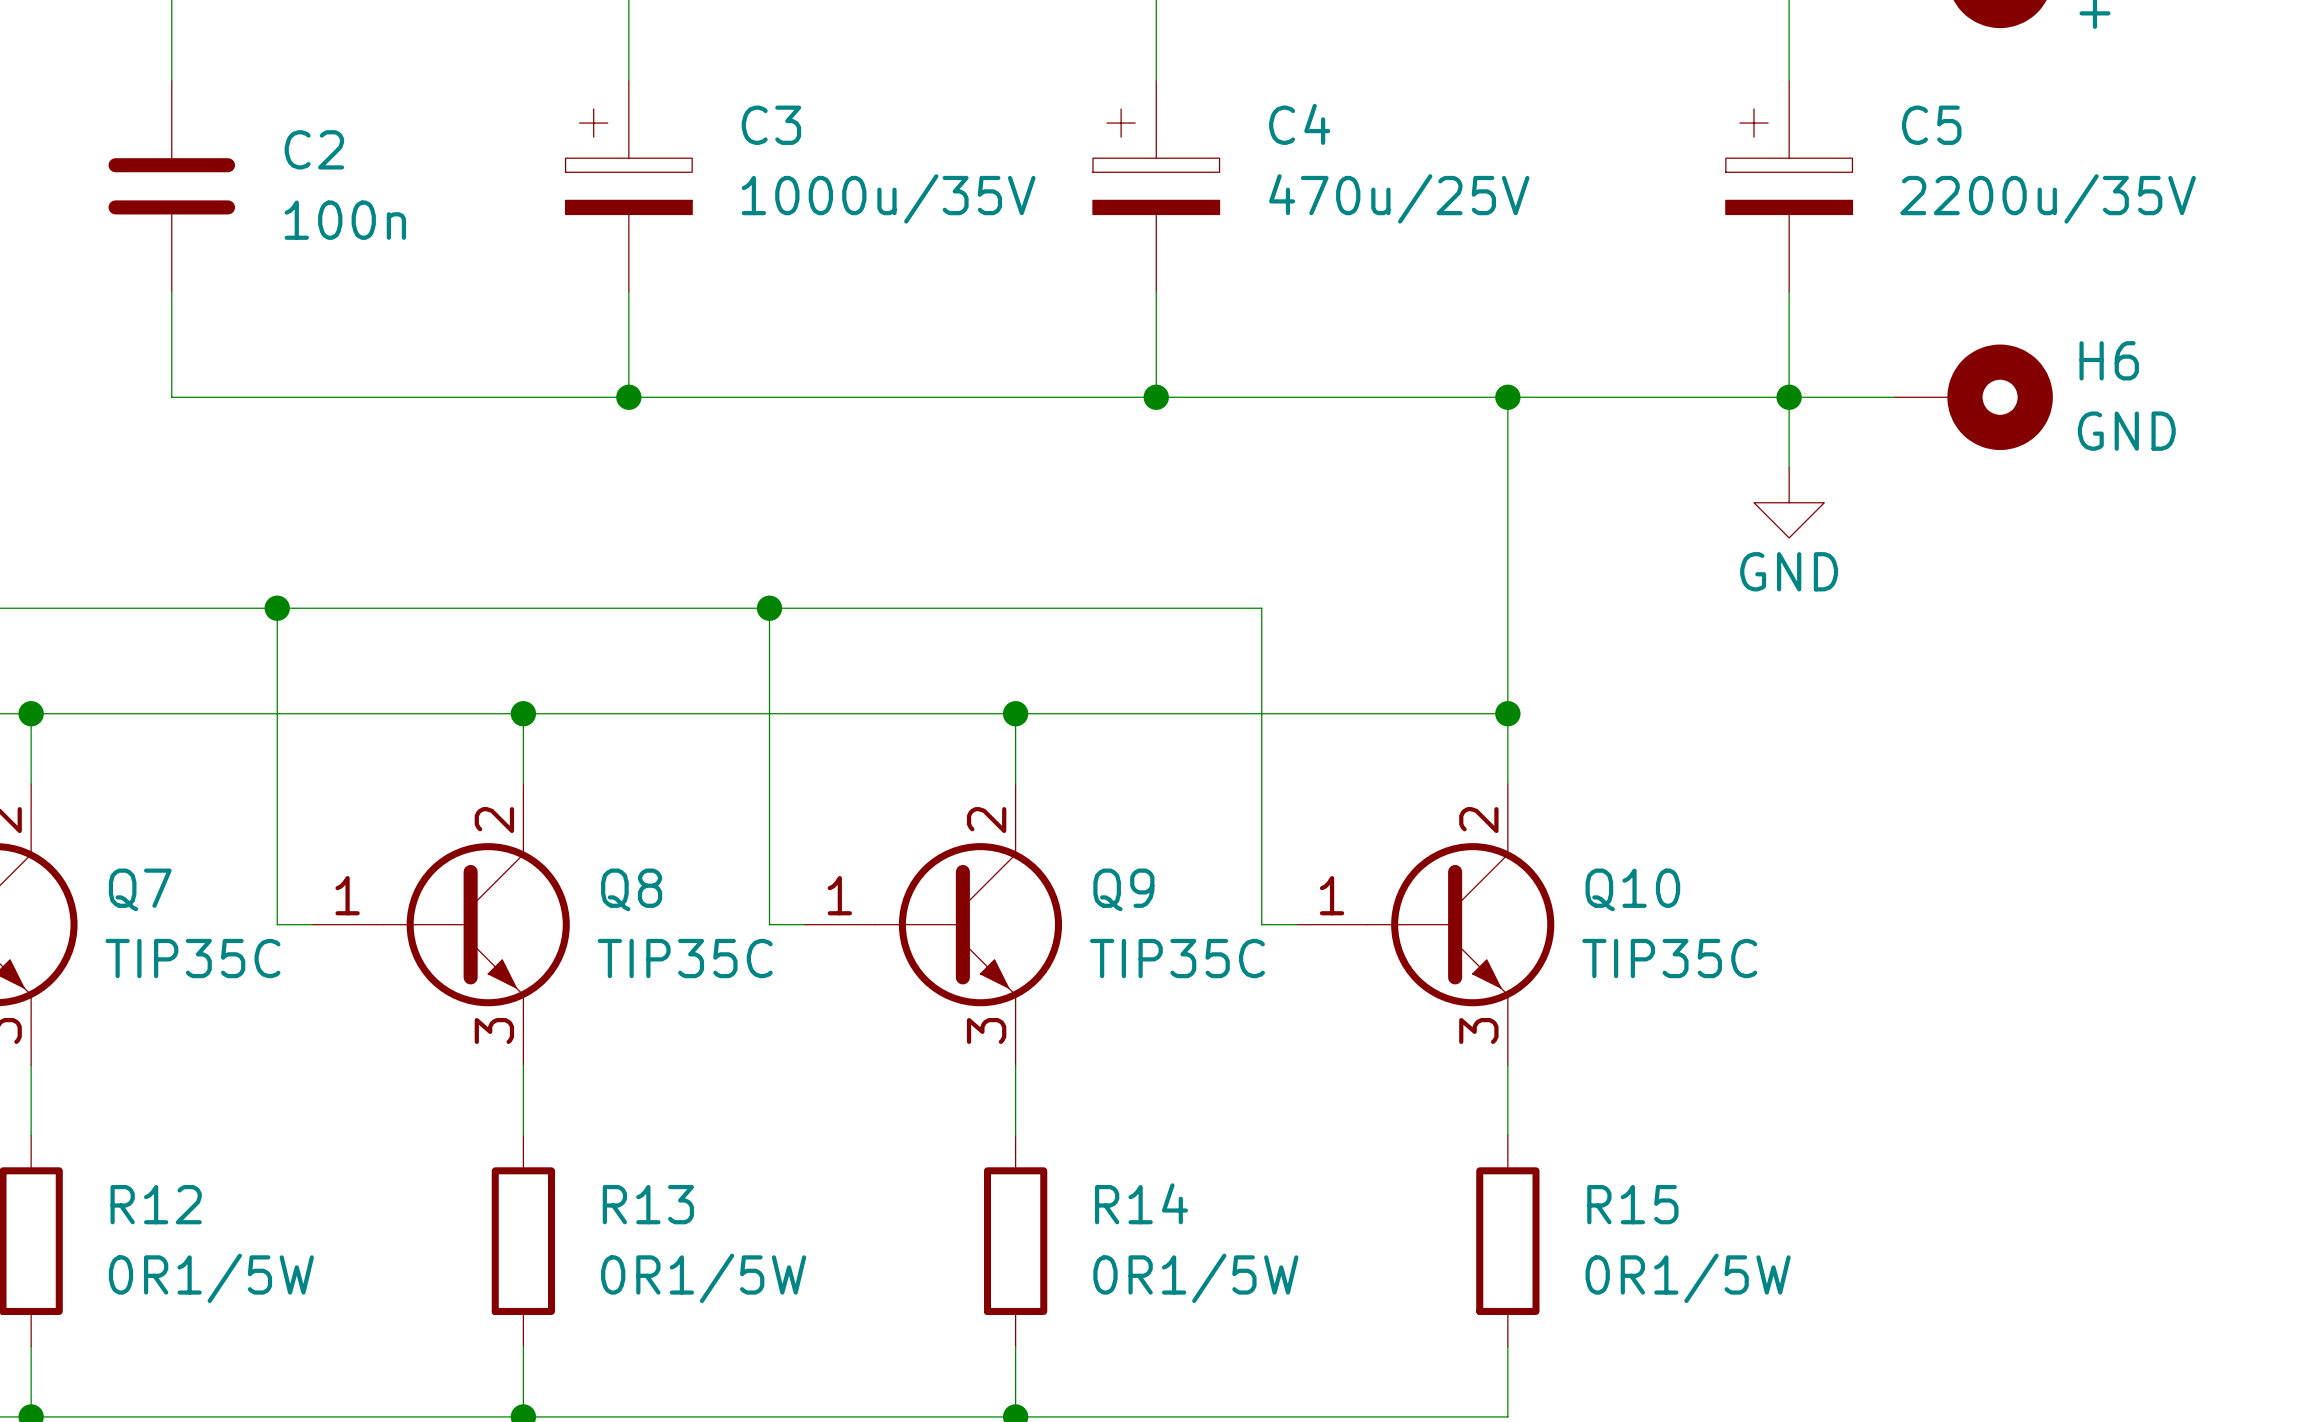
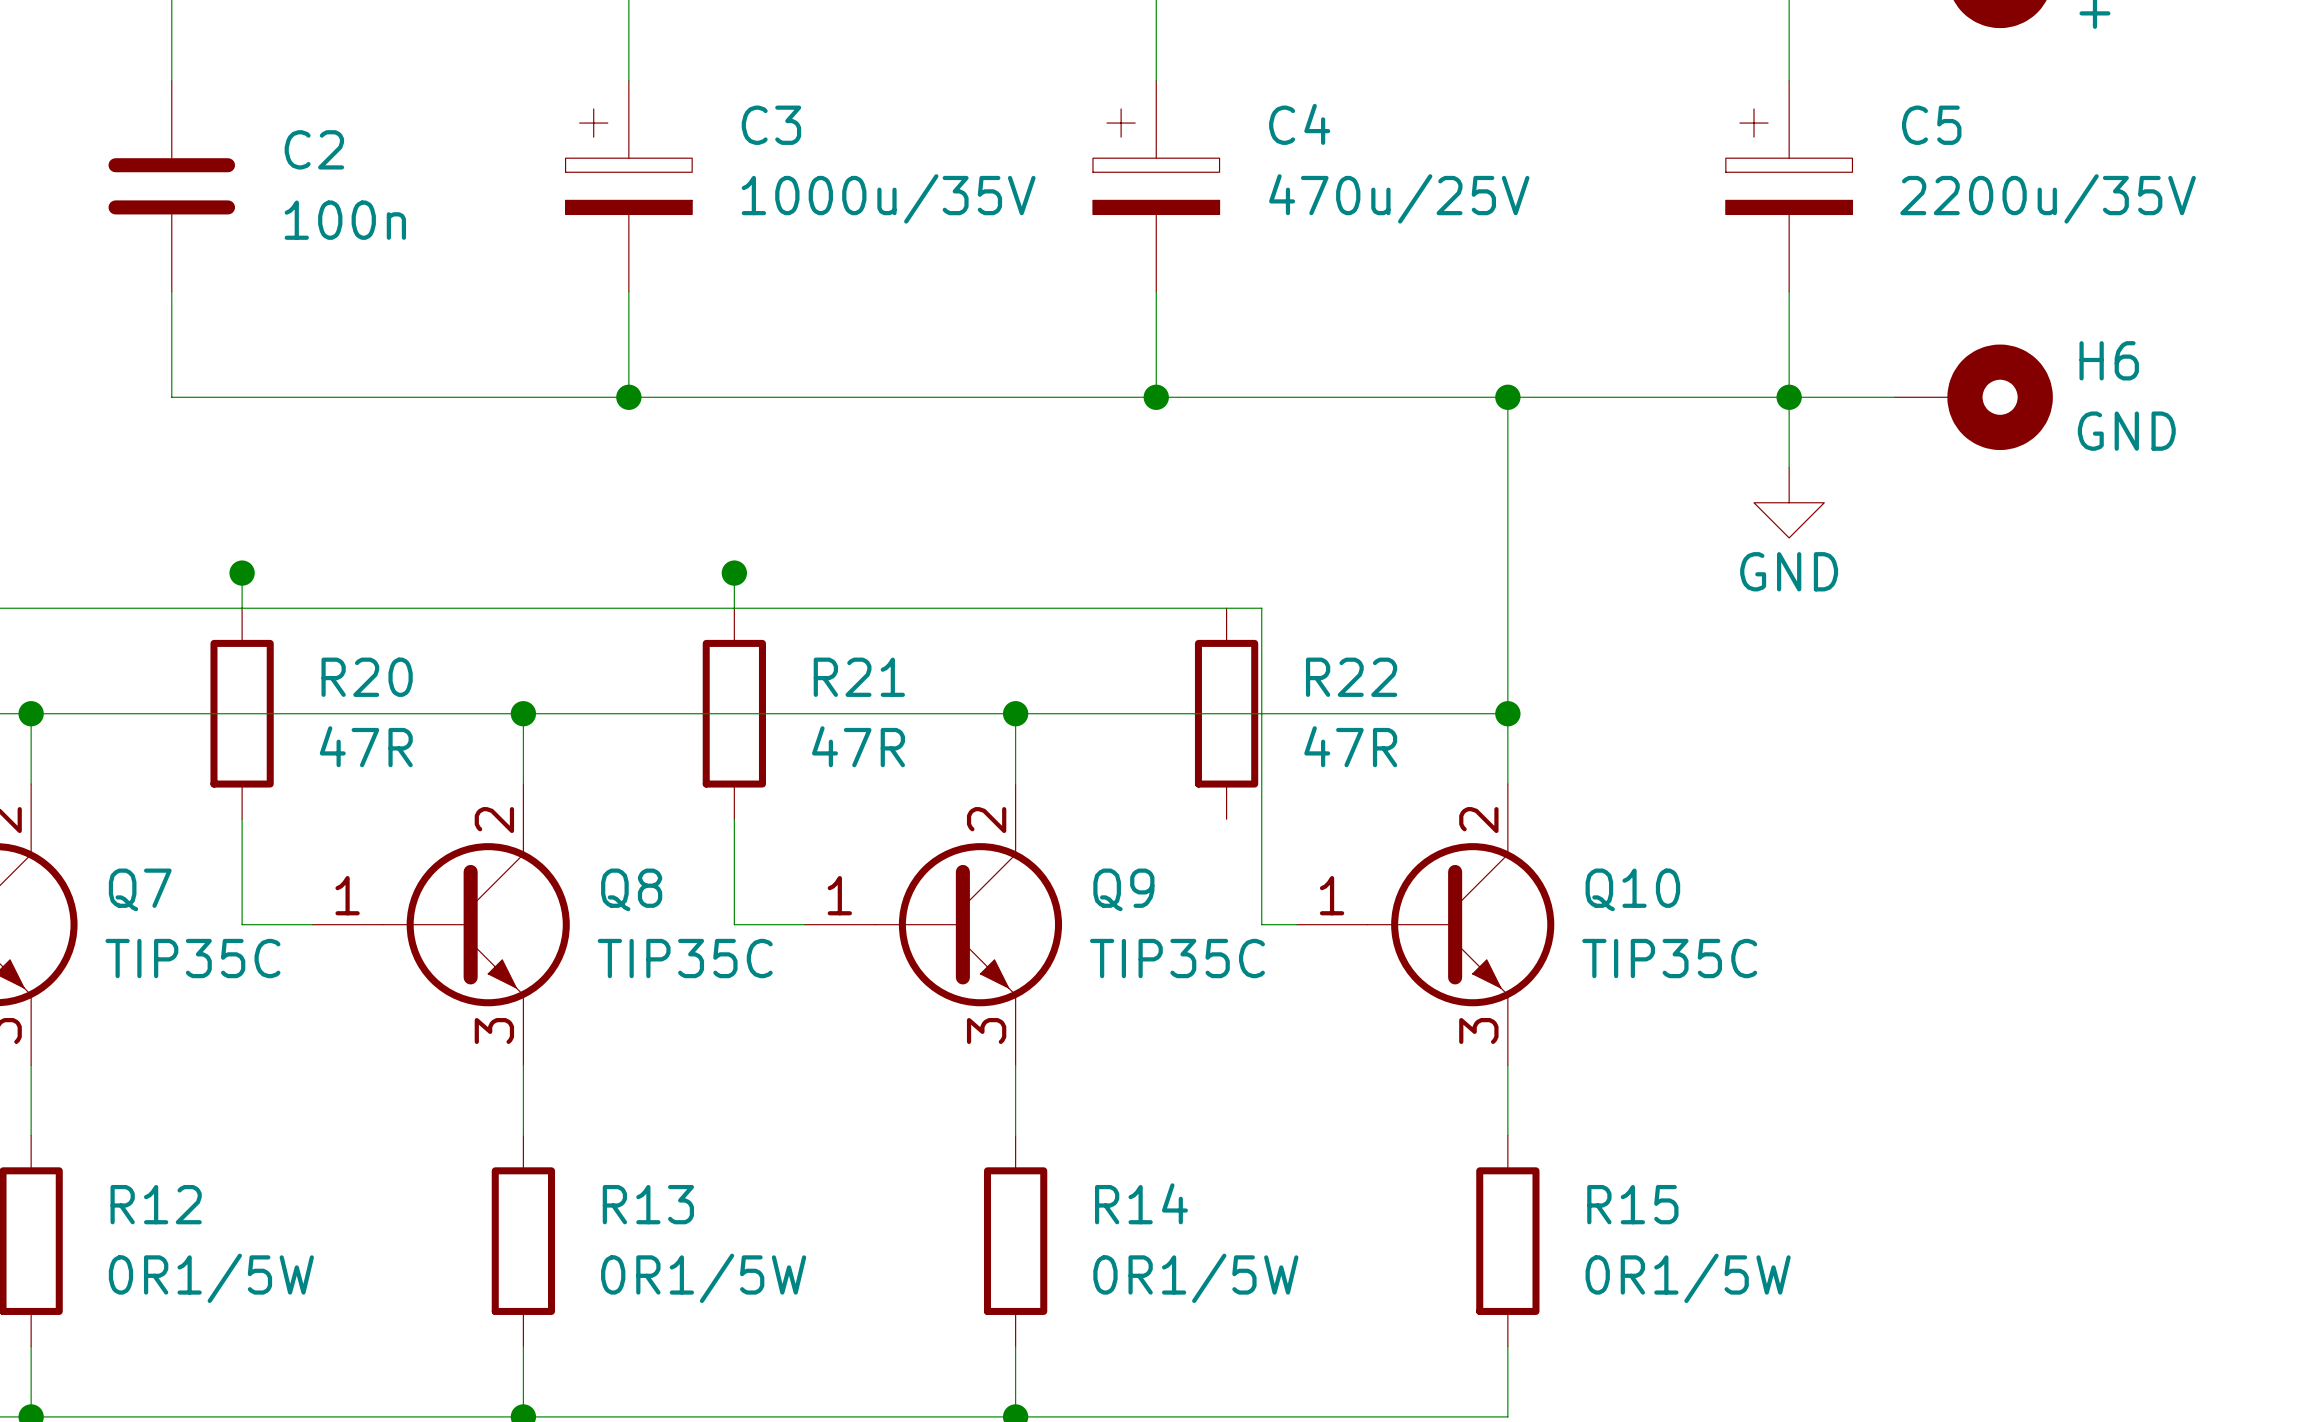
wire: none -> (242, 573) (242, 608)
wire: none -> (734, 573) (734, 608)
wire: (277, 608) (277, 924) -> (242, 819) (242, 924) (277, 924)
junction position: (277, 608) -> (242, 573)
wire: (769, 608) (769, 924) -> (734, 819) (734, 924) (769, 924)
junction position: (769, 608) -> (734, 573)
R20: none -> 47R (242, 713)
R21: none -> 47R (734, 713)
R22: none -> 47R (1226, 713)

